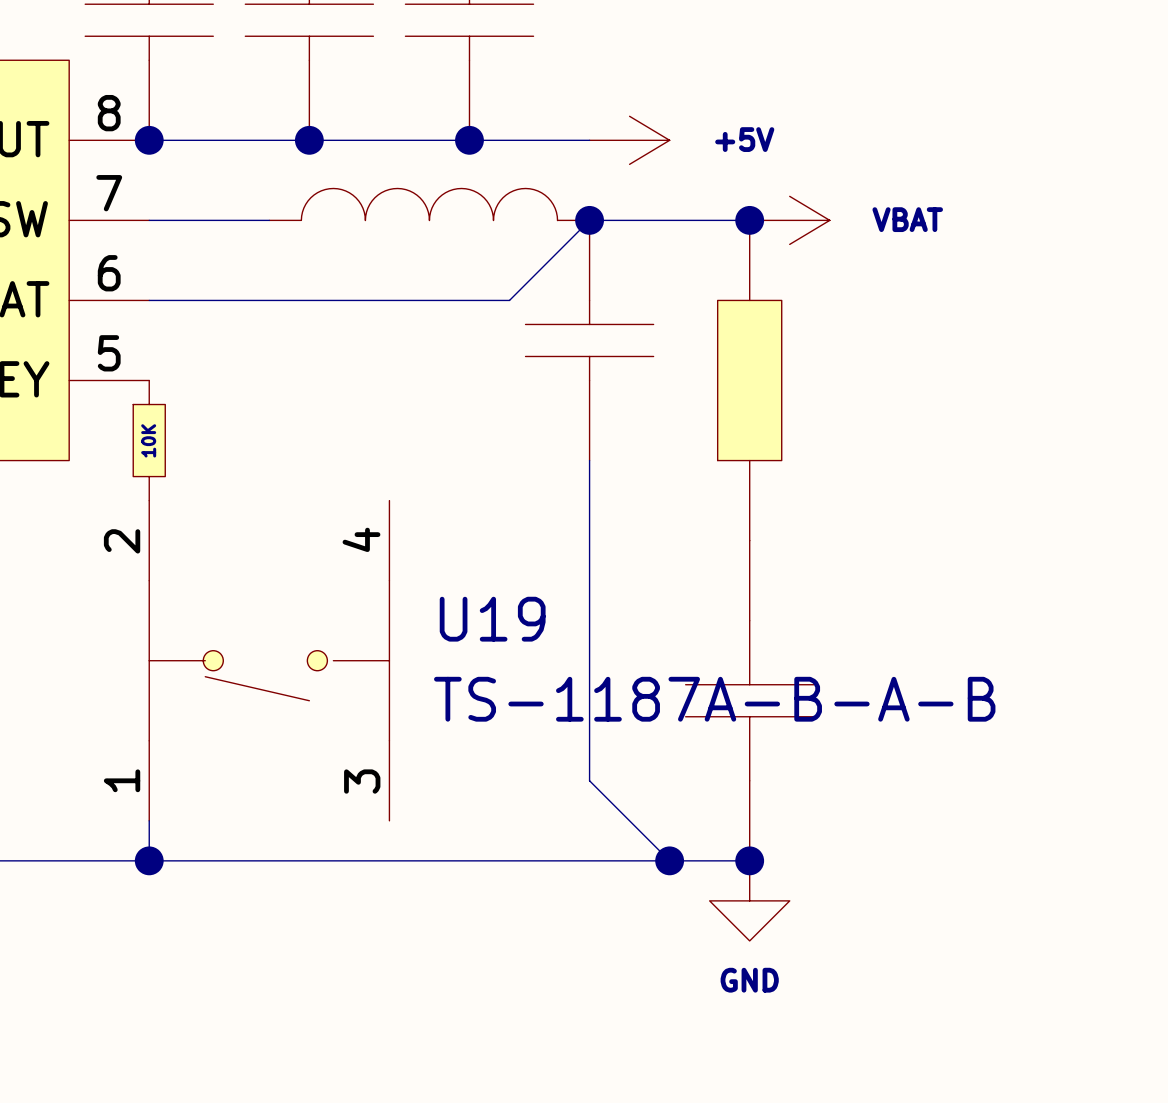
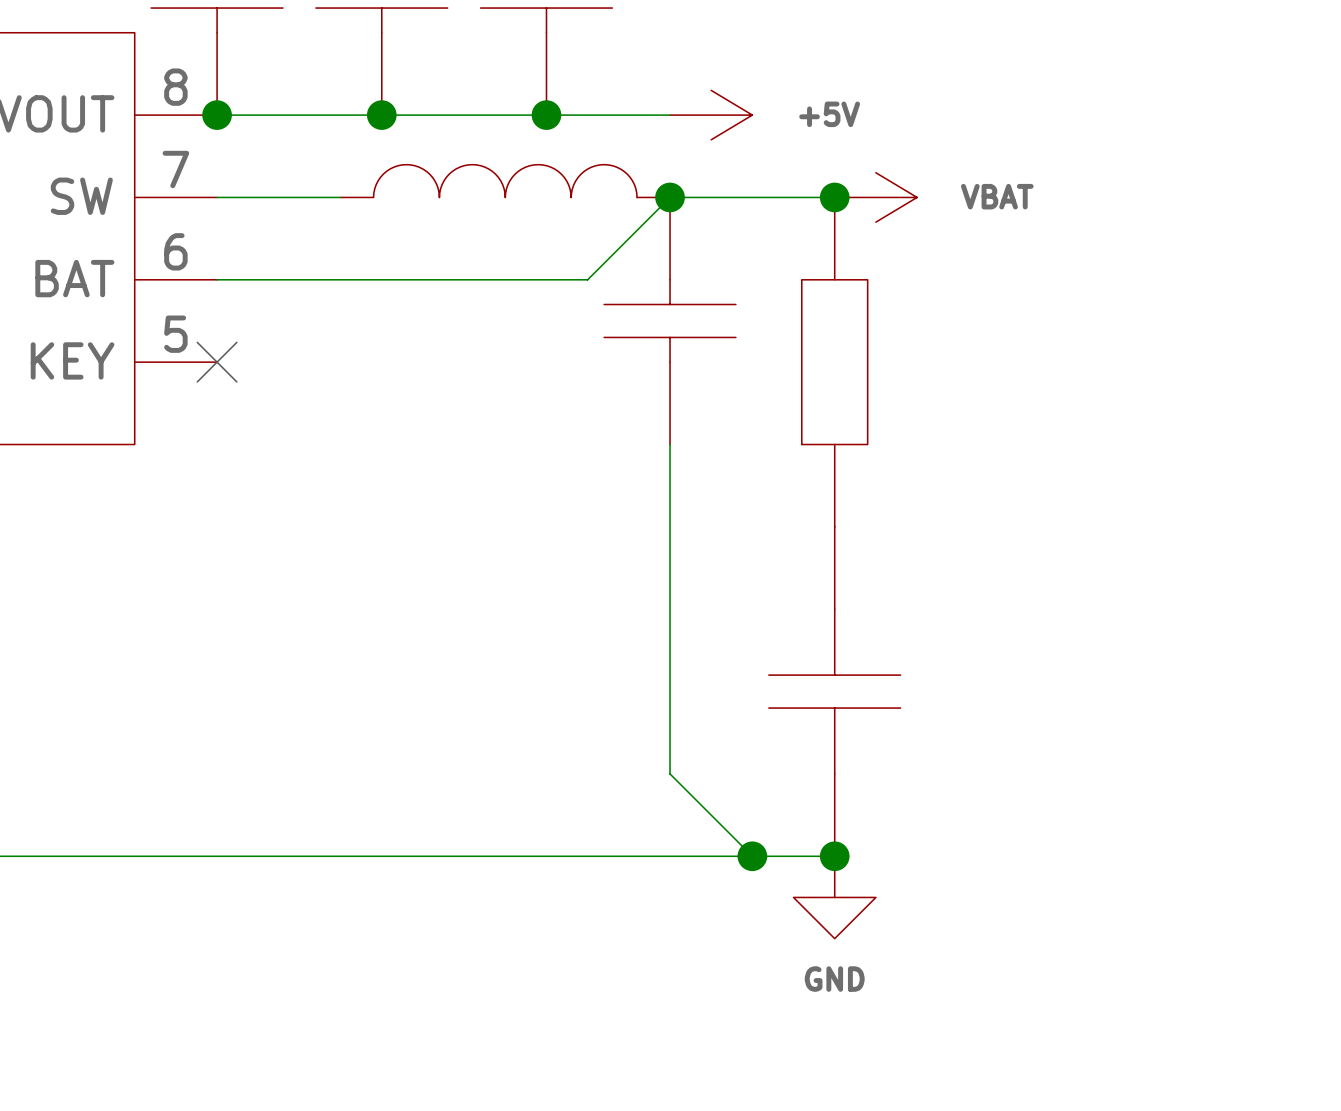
no-connect mark: none -> (217, 362)
part: 10K (149, 440) -> none
U19: TS-1187A-B-A-B (269, 660) -> none
wire: (149, 820) (149, 860) -> none
junction: (149, 860) -> none

